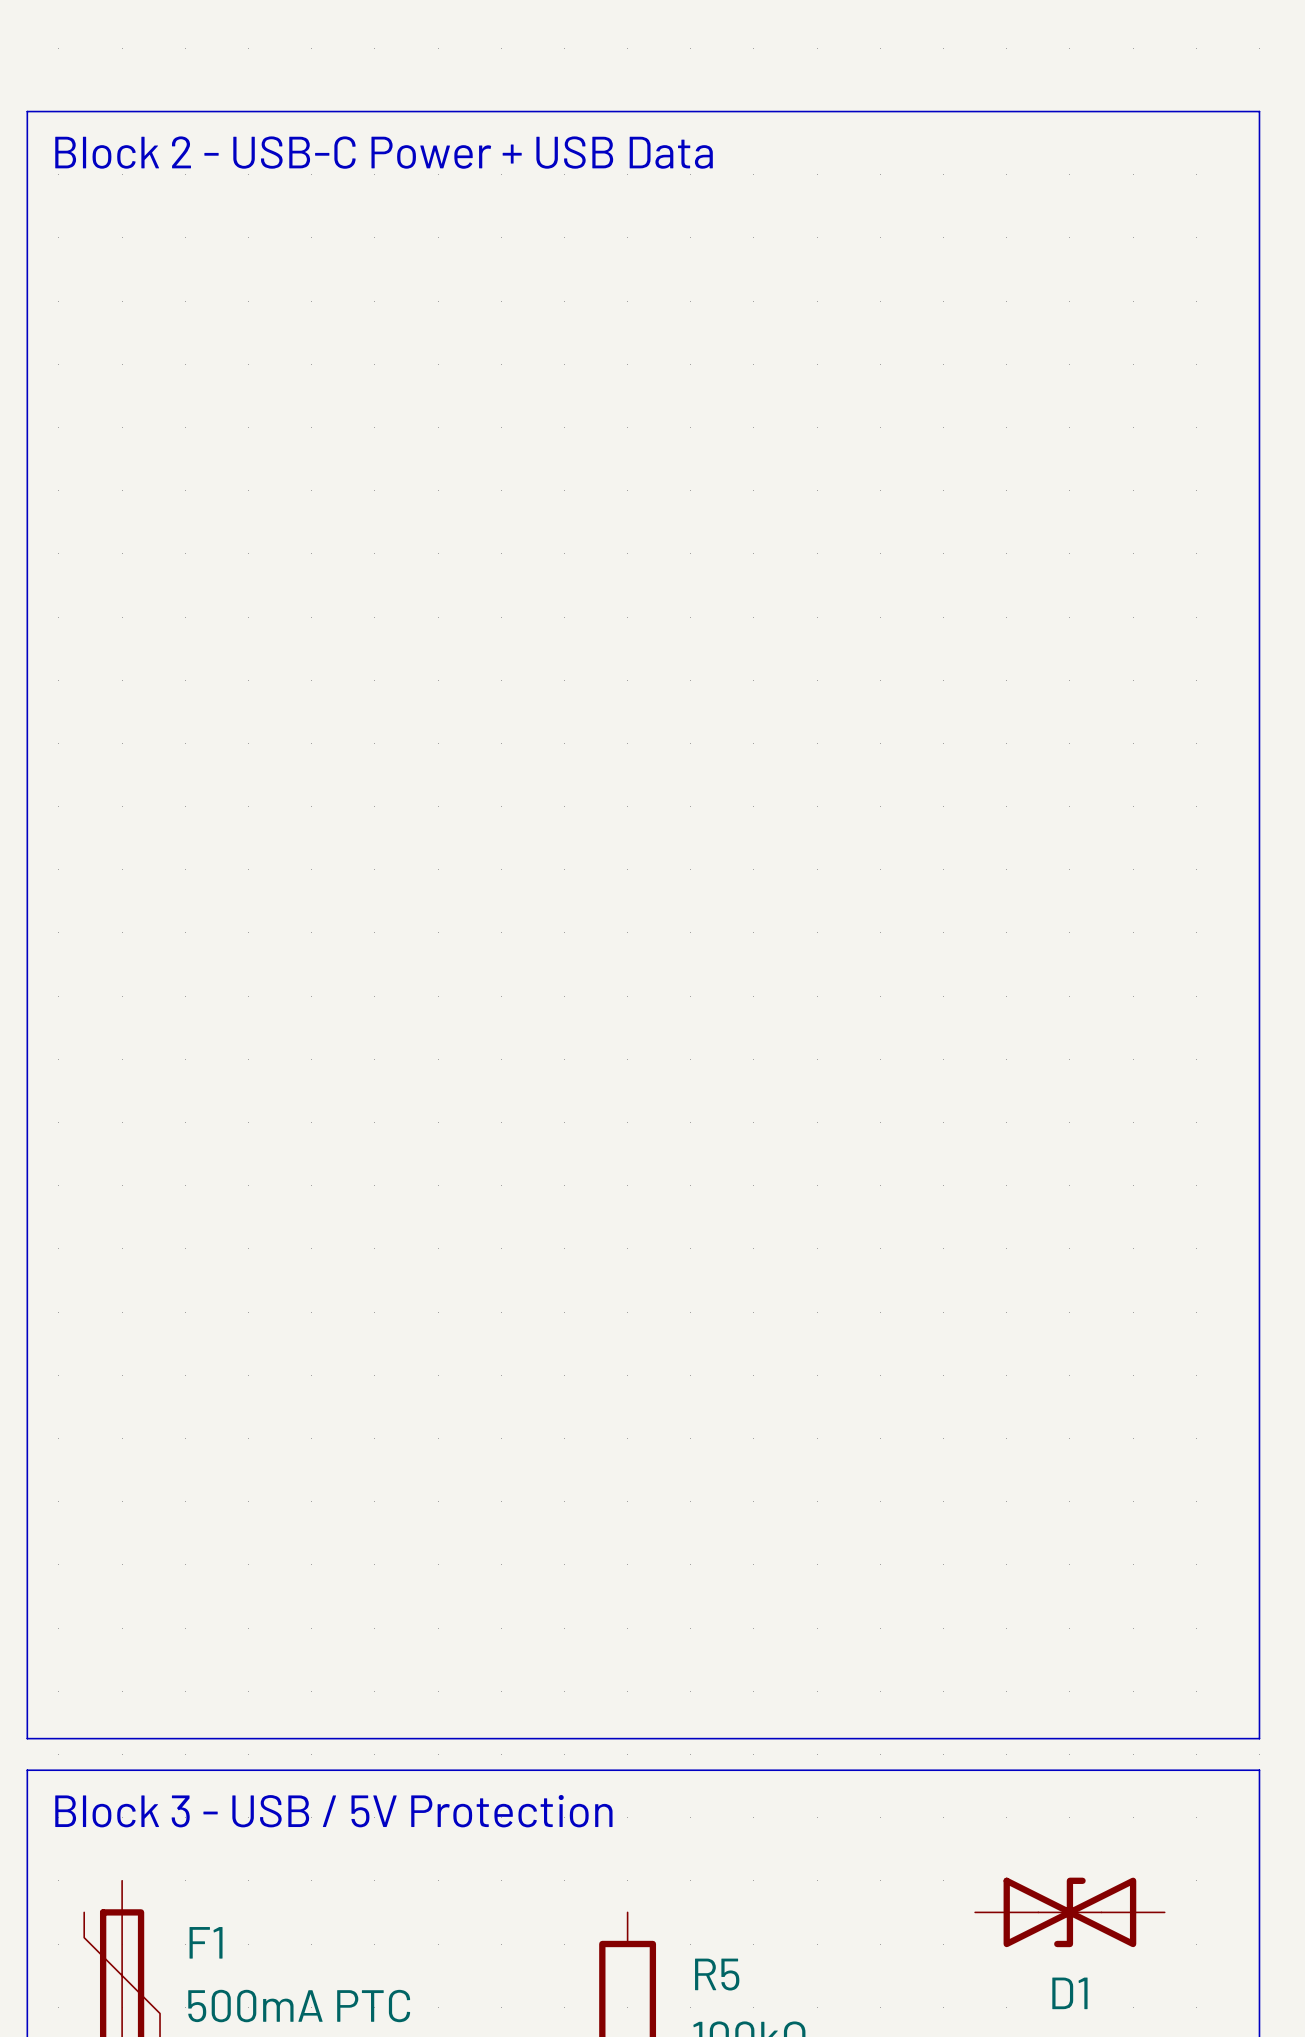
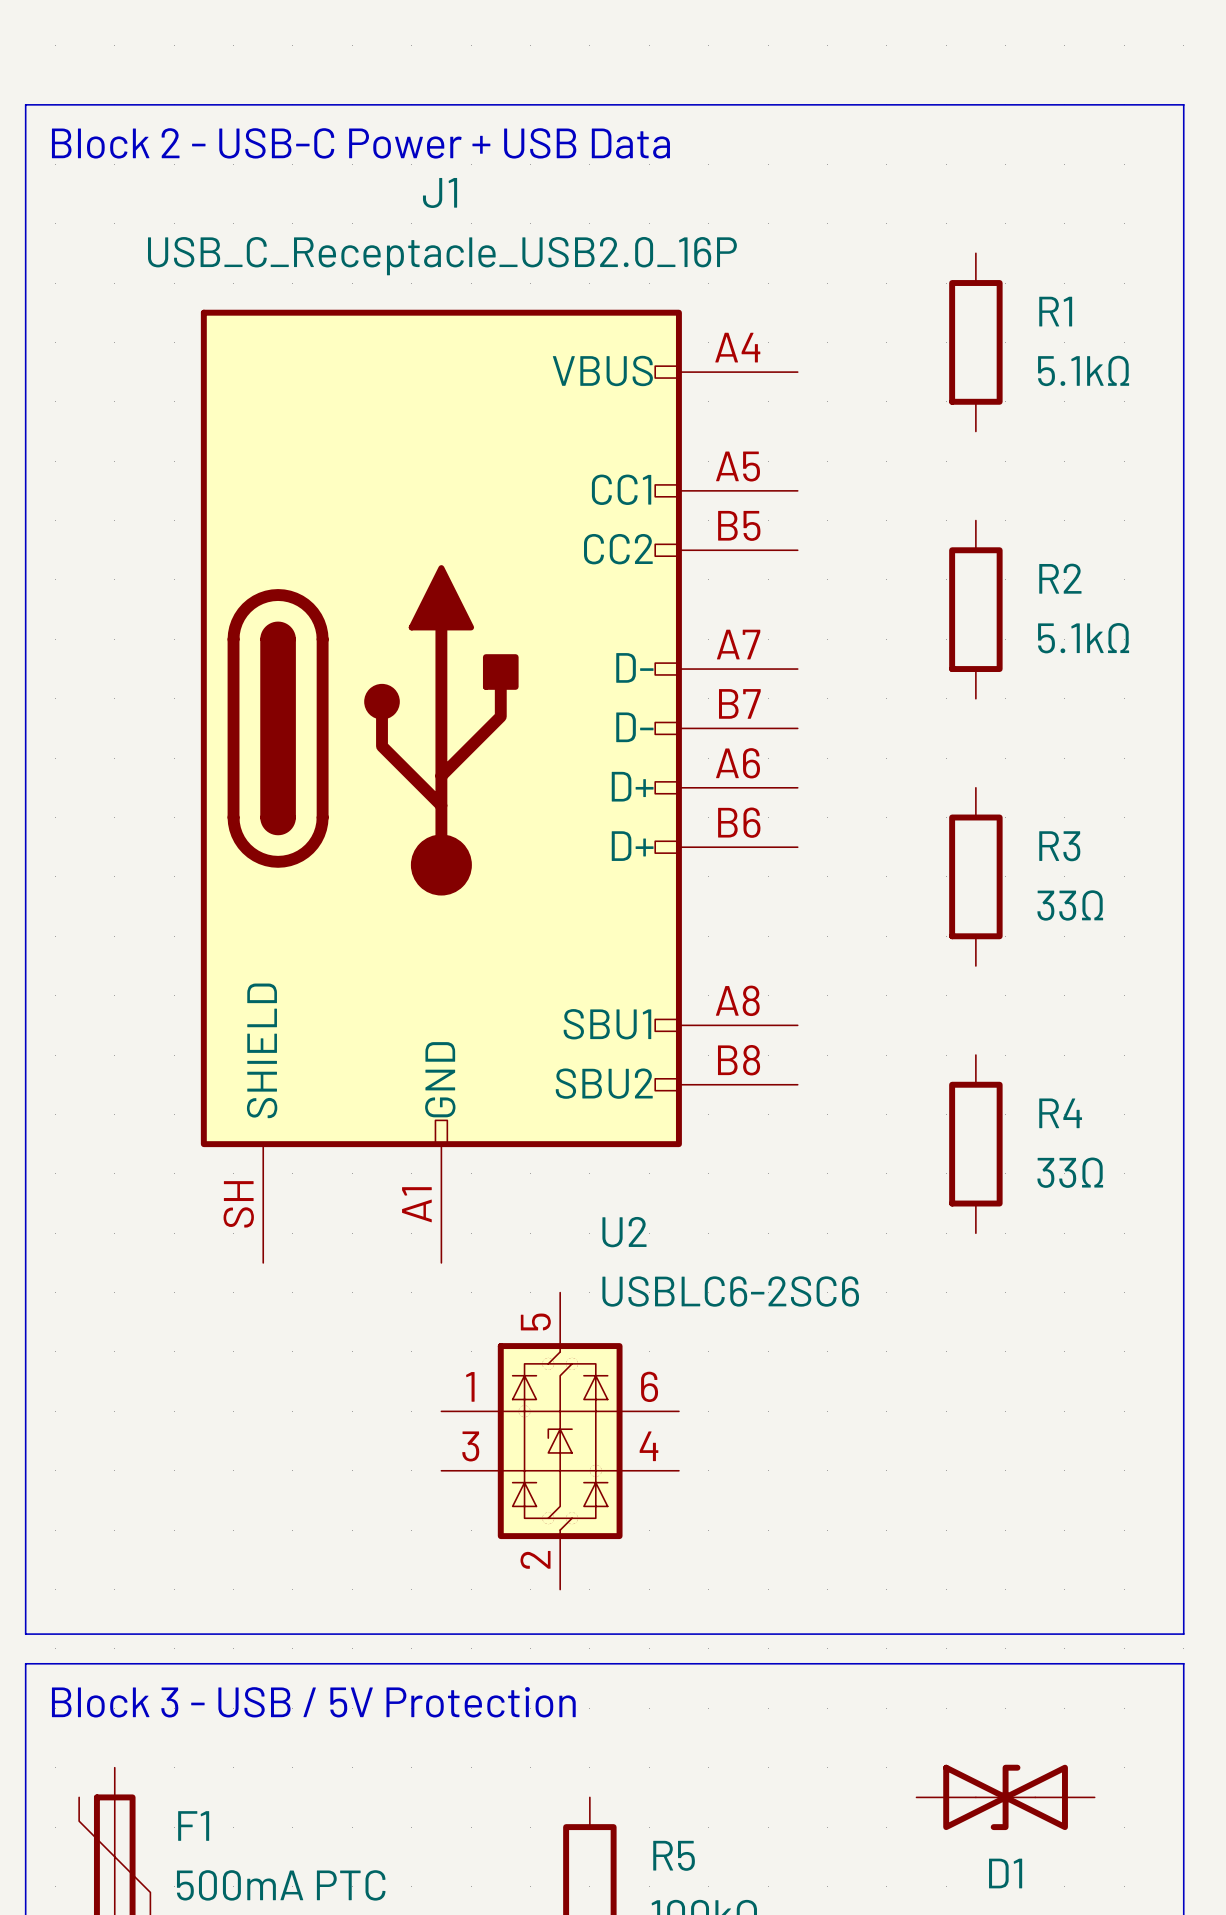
R1: none -> 5.1kΩ (975, 342)
R2: none -> 5.1kΩ (975, 609)
J1: none -> USB_C_Receptacle_USB2.0_16P (499, 786)
R3: none -> 33Ω (975, 876)
R4: none -> 33Ω (975, 1144)
U2: none -> USBLC6-2SC6 (560, 1441)

